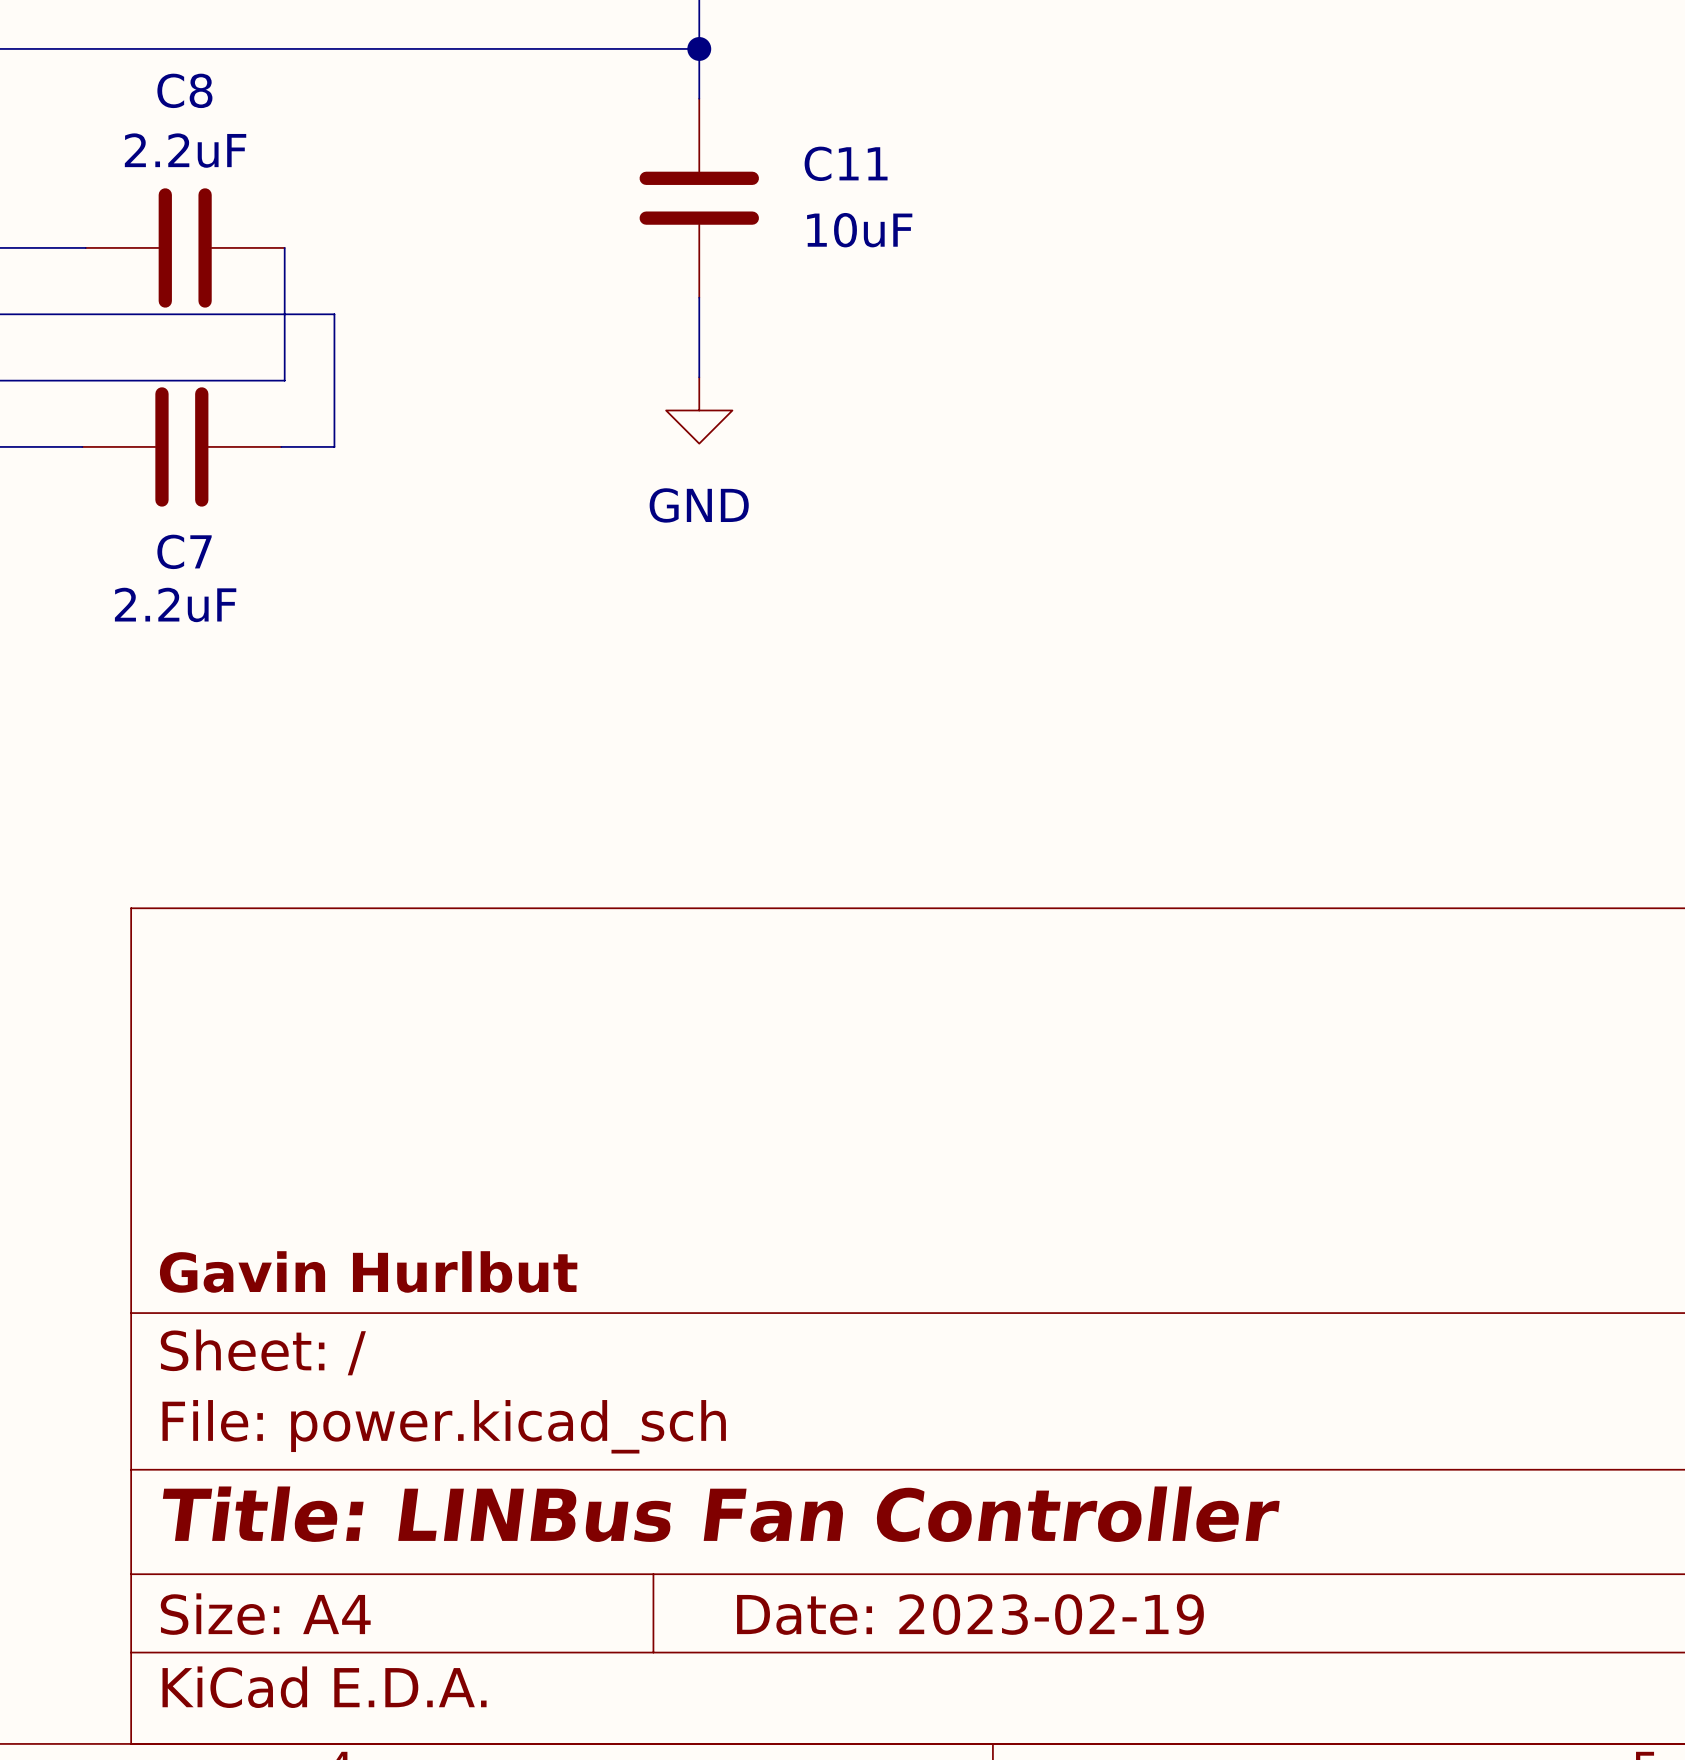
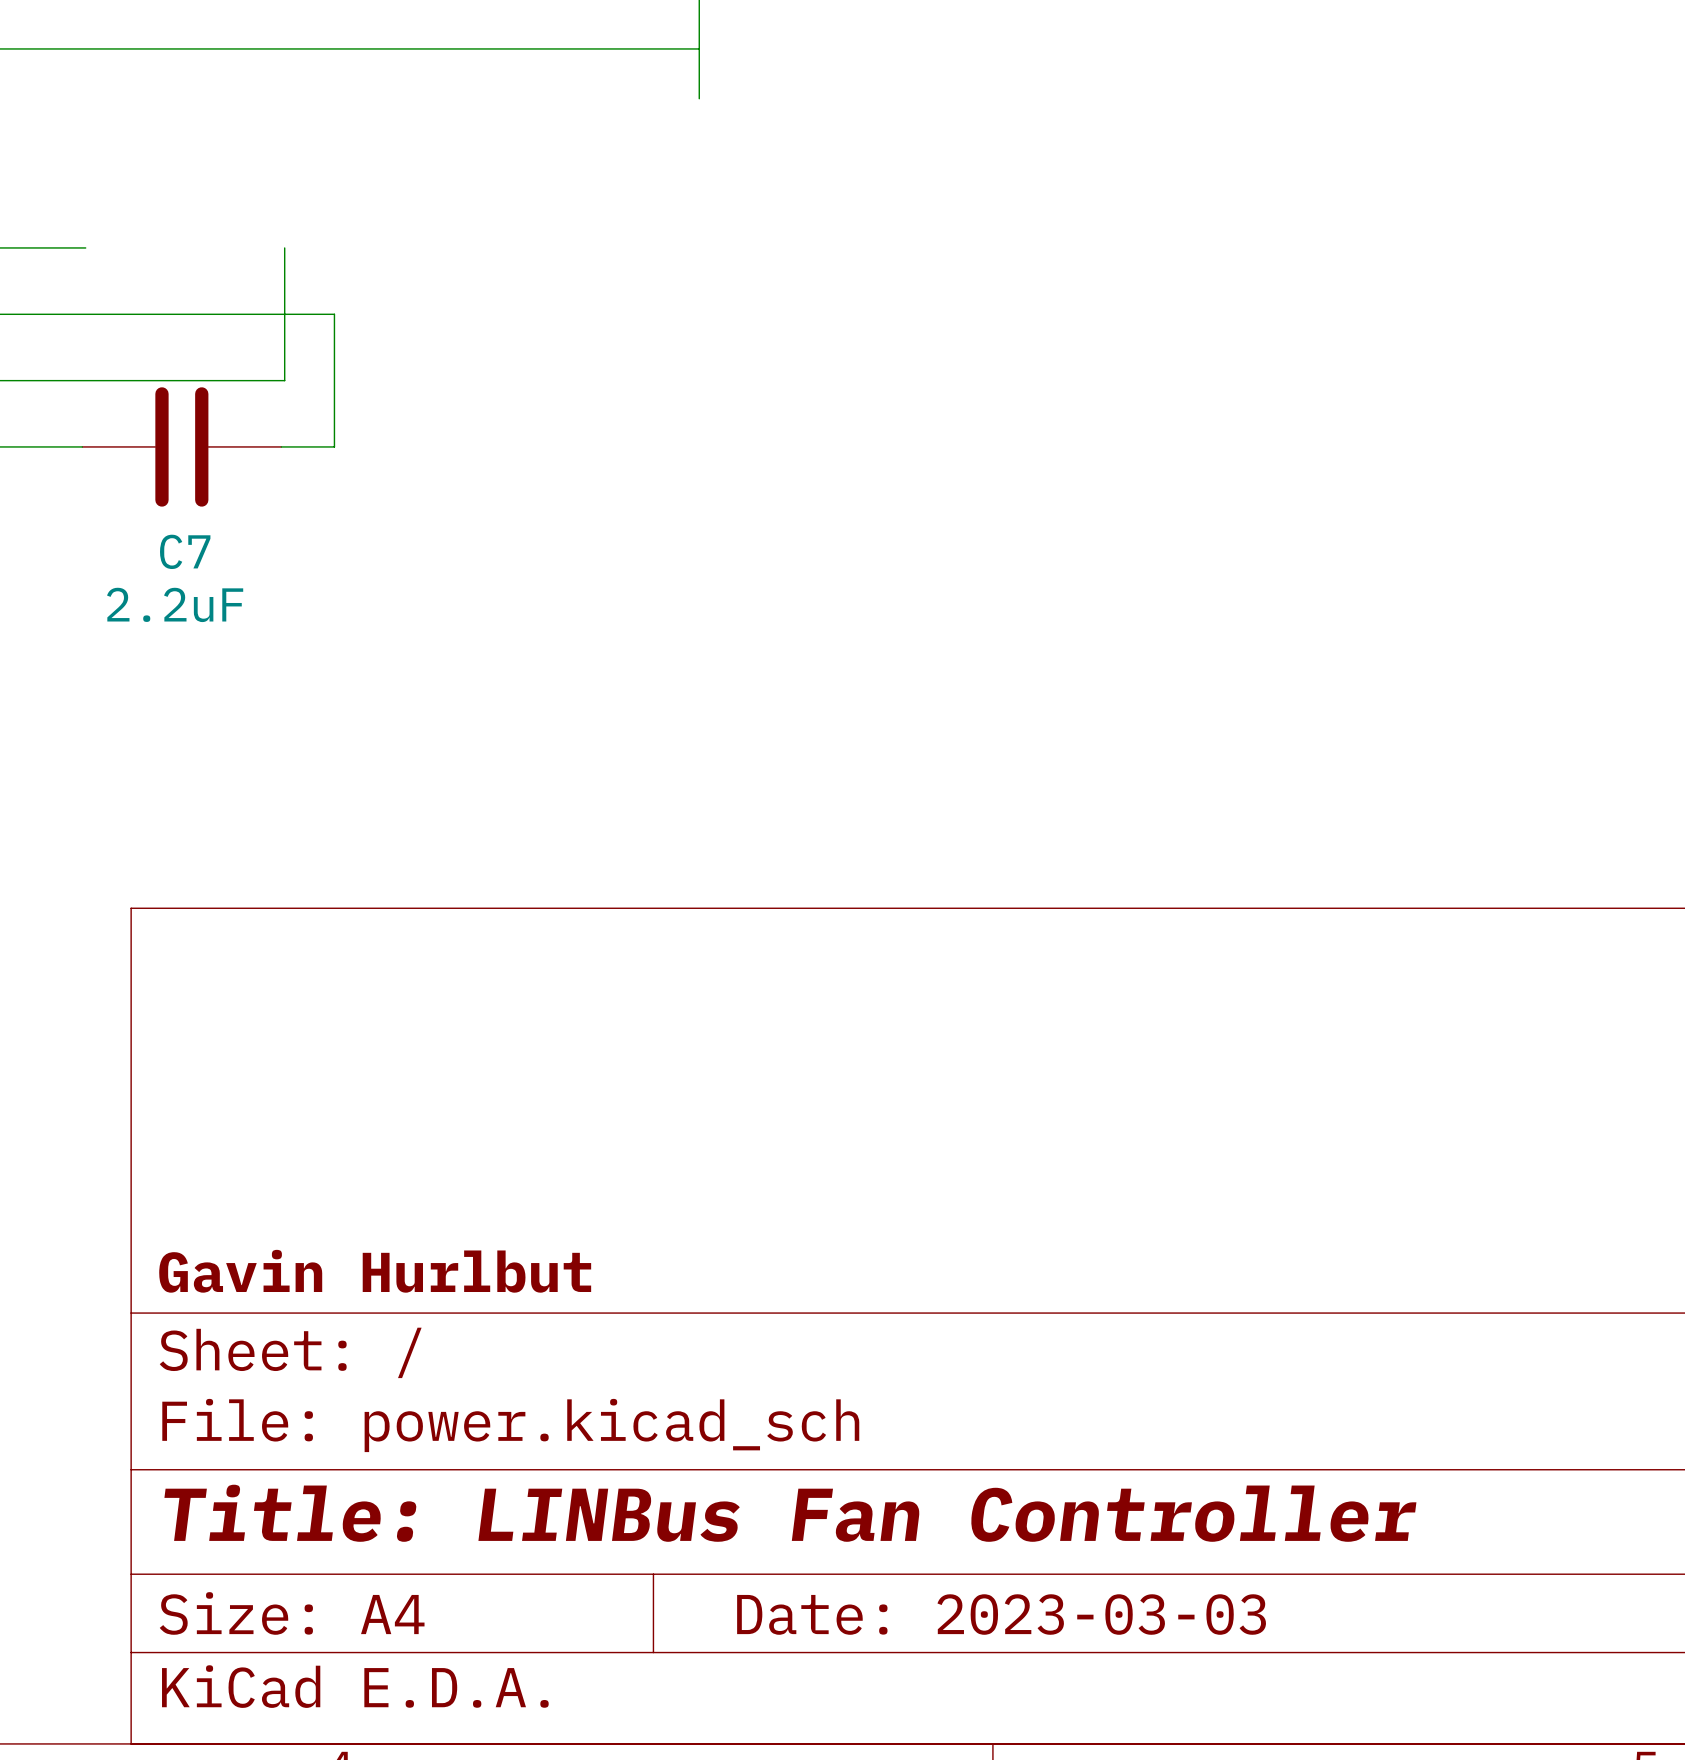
junction: (699, 48) -> none
C11: 10uF (699, 198) -> none
C8: 2.2uF (185, 247) -> none
wire: (699, 297) (699, 377) -> none
power symbol: GND (699, 410) -> none
title block: Date: 2023-02-19 (970, 1614) -> Date: 2023-03-03 (1001, 1614)

